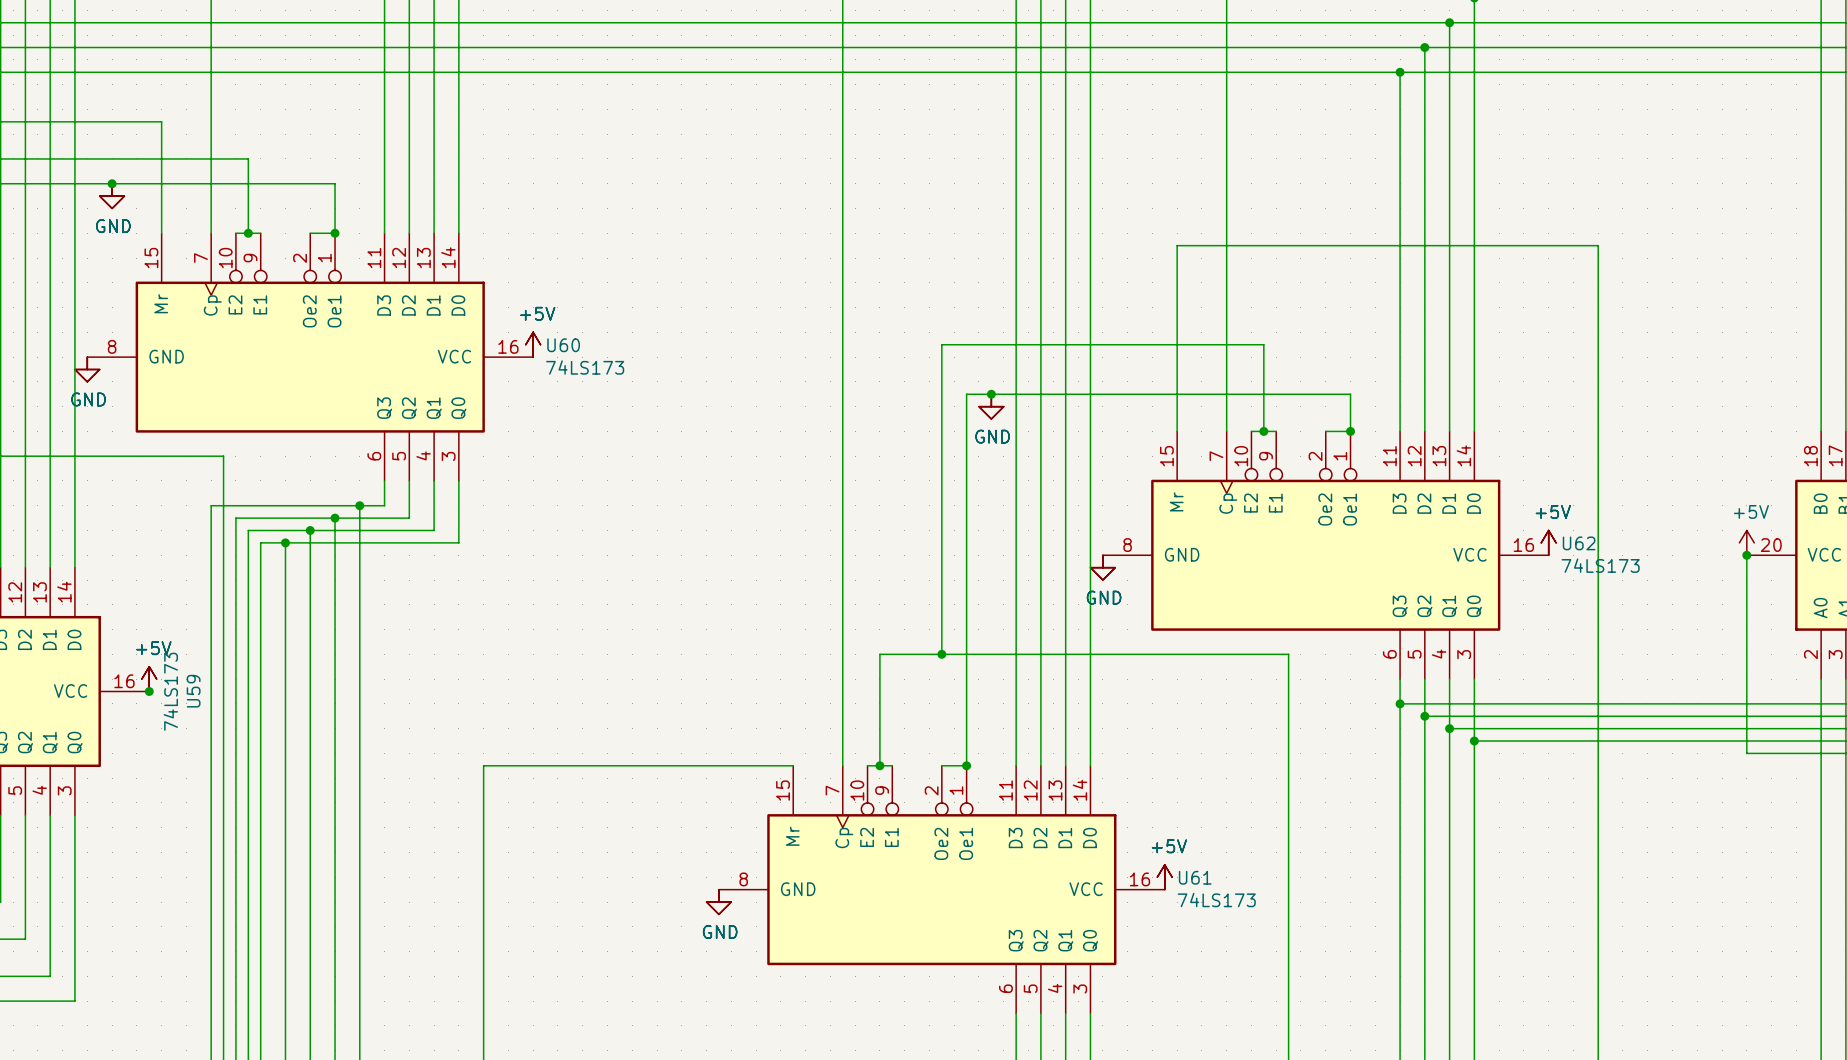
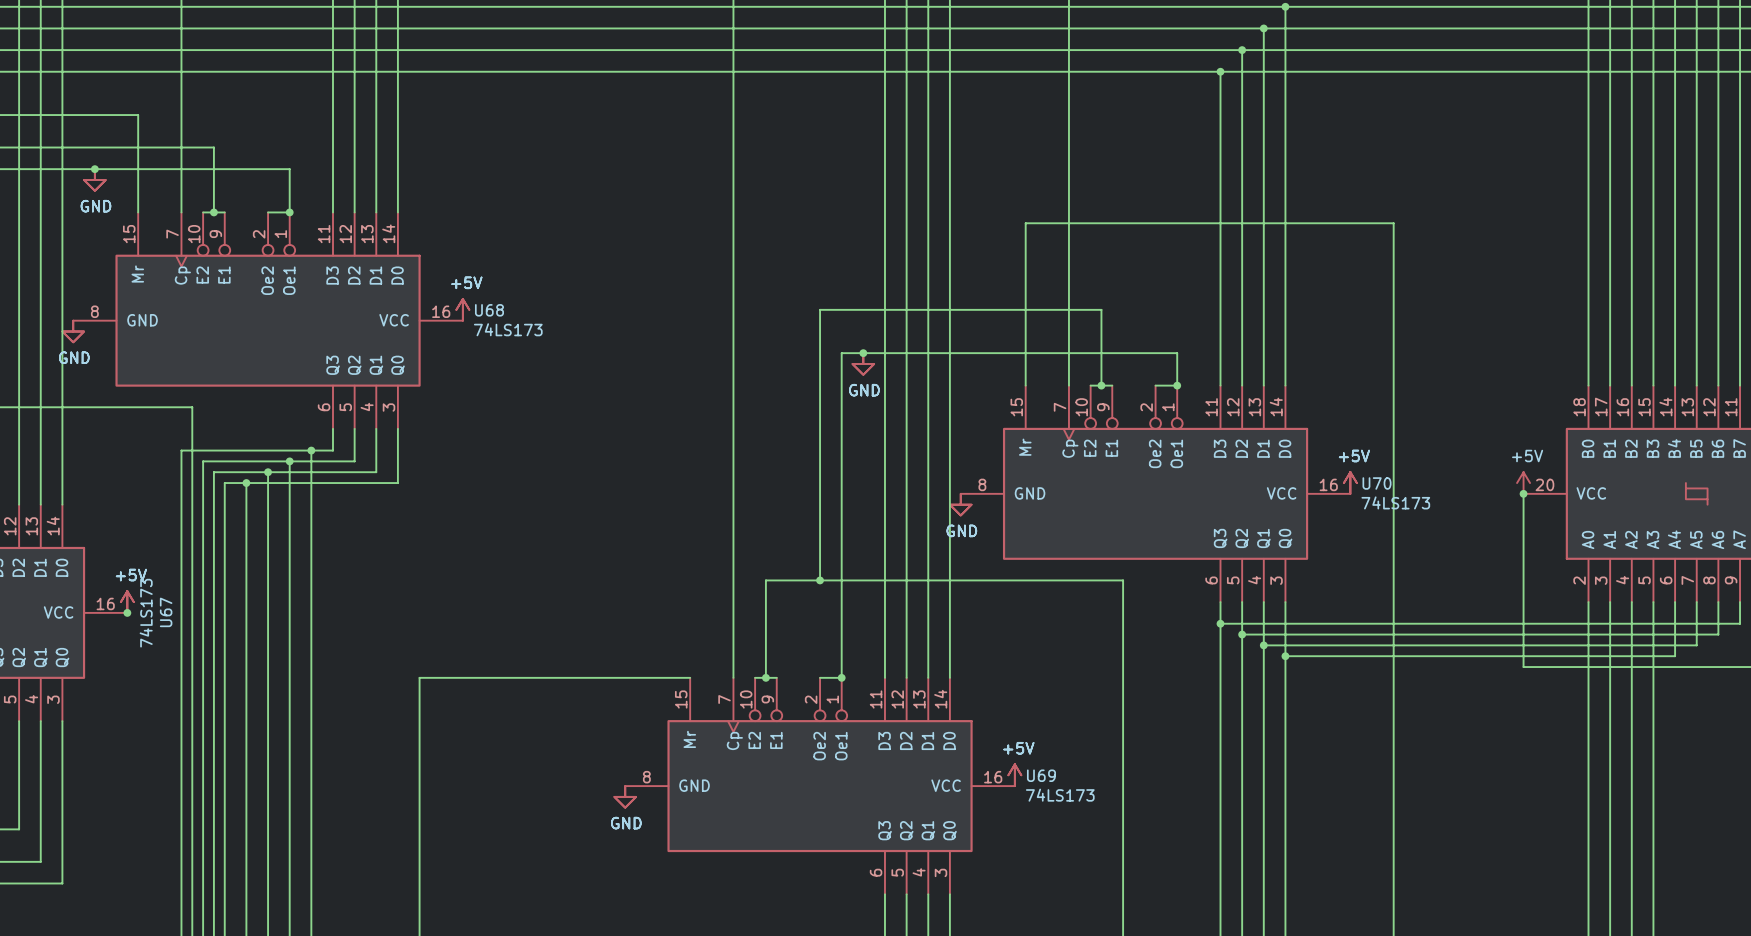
U60 name: U60 (563, 345) -> U68 (489, 310)
U62 name: U62 (1579, 543) -> U70 (1377, 483)
U59 name: U59 (193, 691) -> U67 (166, 612)
U61 name: U61 (1195, 877) -> U69 (1041, 775)

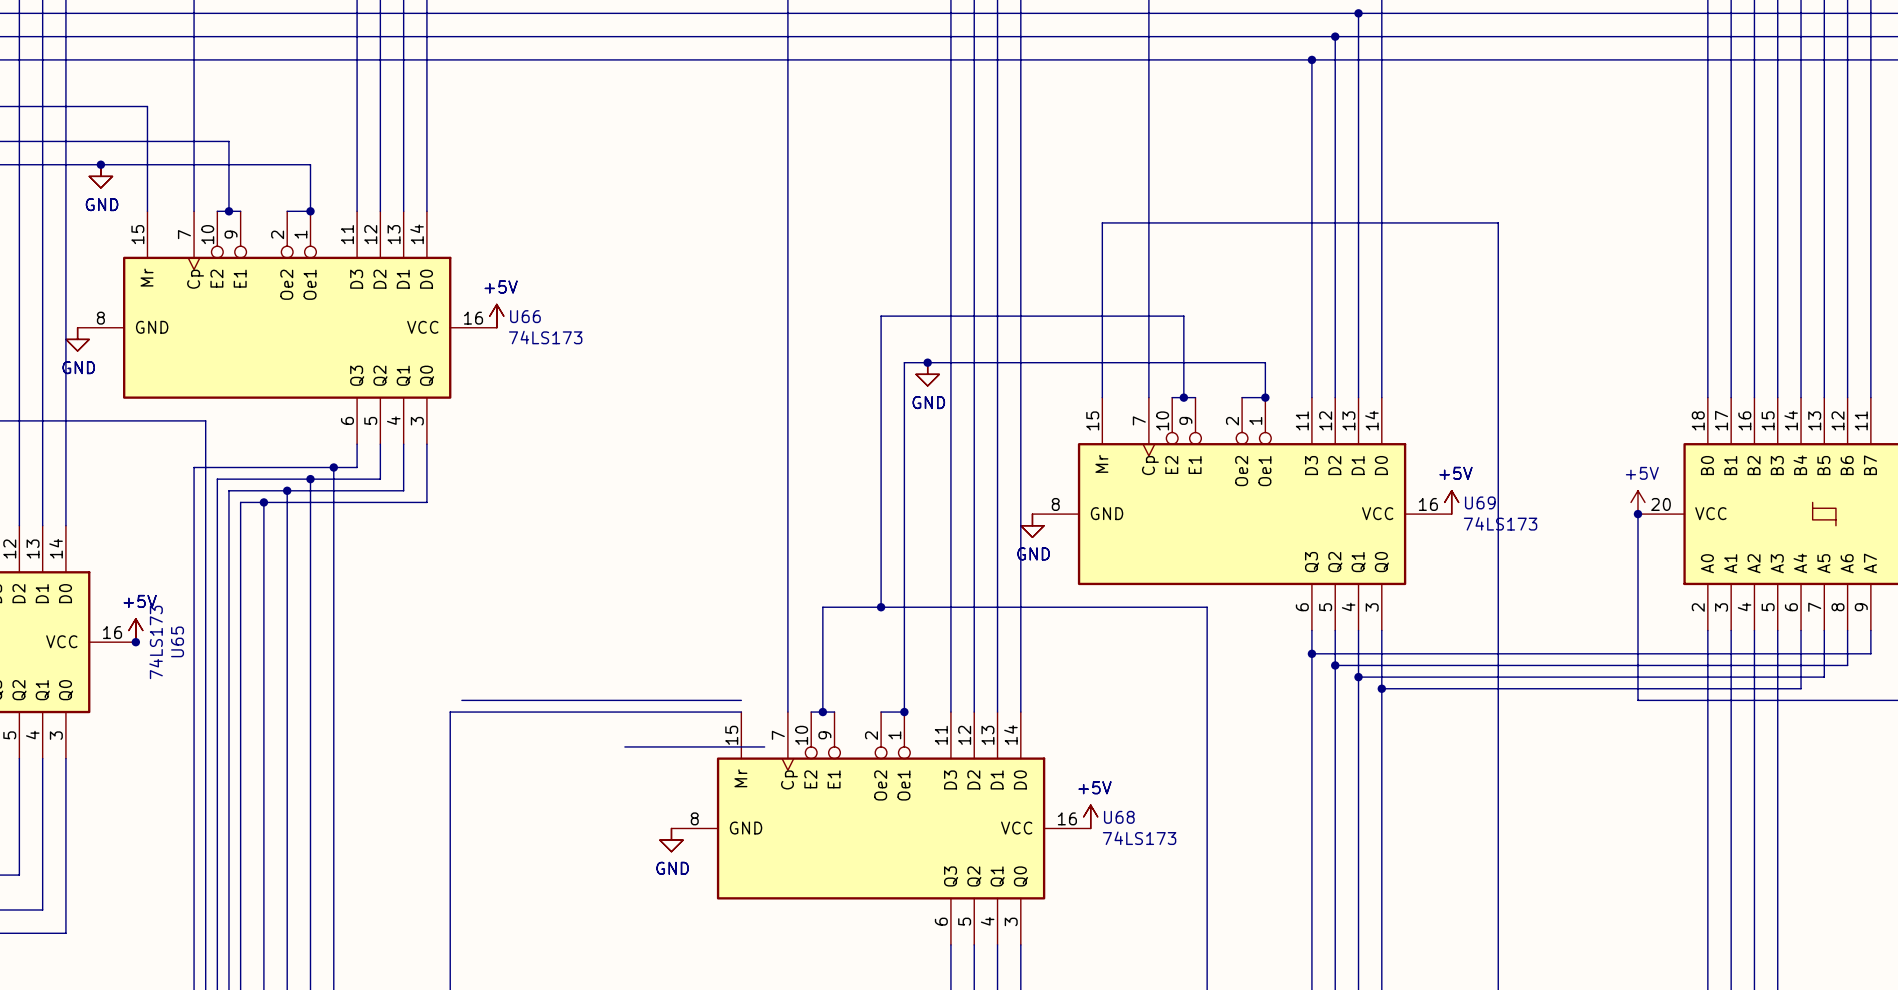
U68 name: U68 (489, 310) -> U66 (525, 316)
U70 name: U70 (1377, 483) -> U69 (1480, 502)
U67 name: U67 (166, 612) -> U65 (177, 641)
wire: none -> (461, 700) (741, 700)
wire: none -> (624, 746) (764, 746)
U69 name: U69 (1041, 775) -> U68 (1119, 817)

